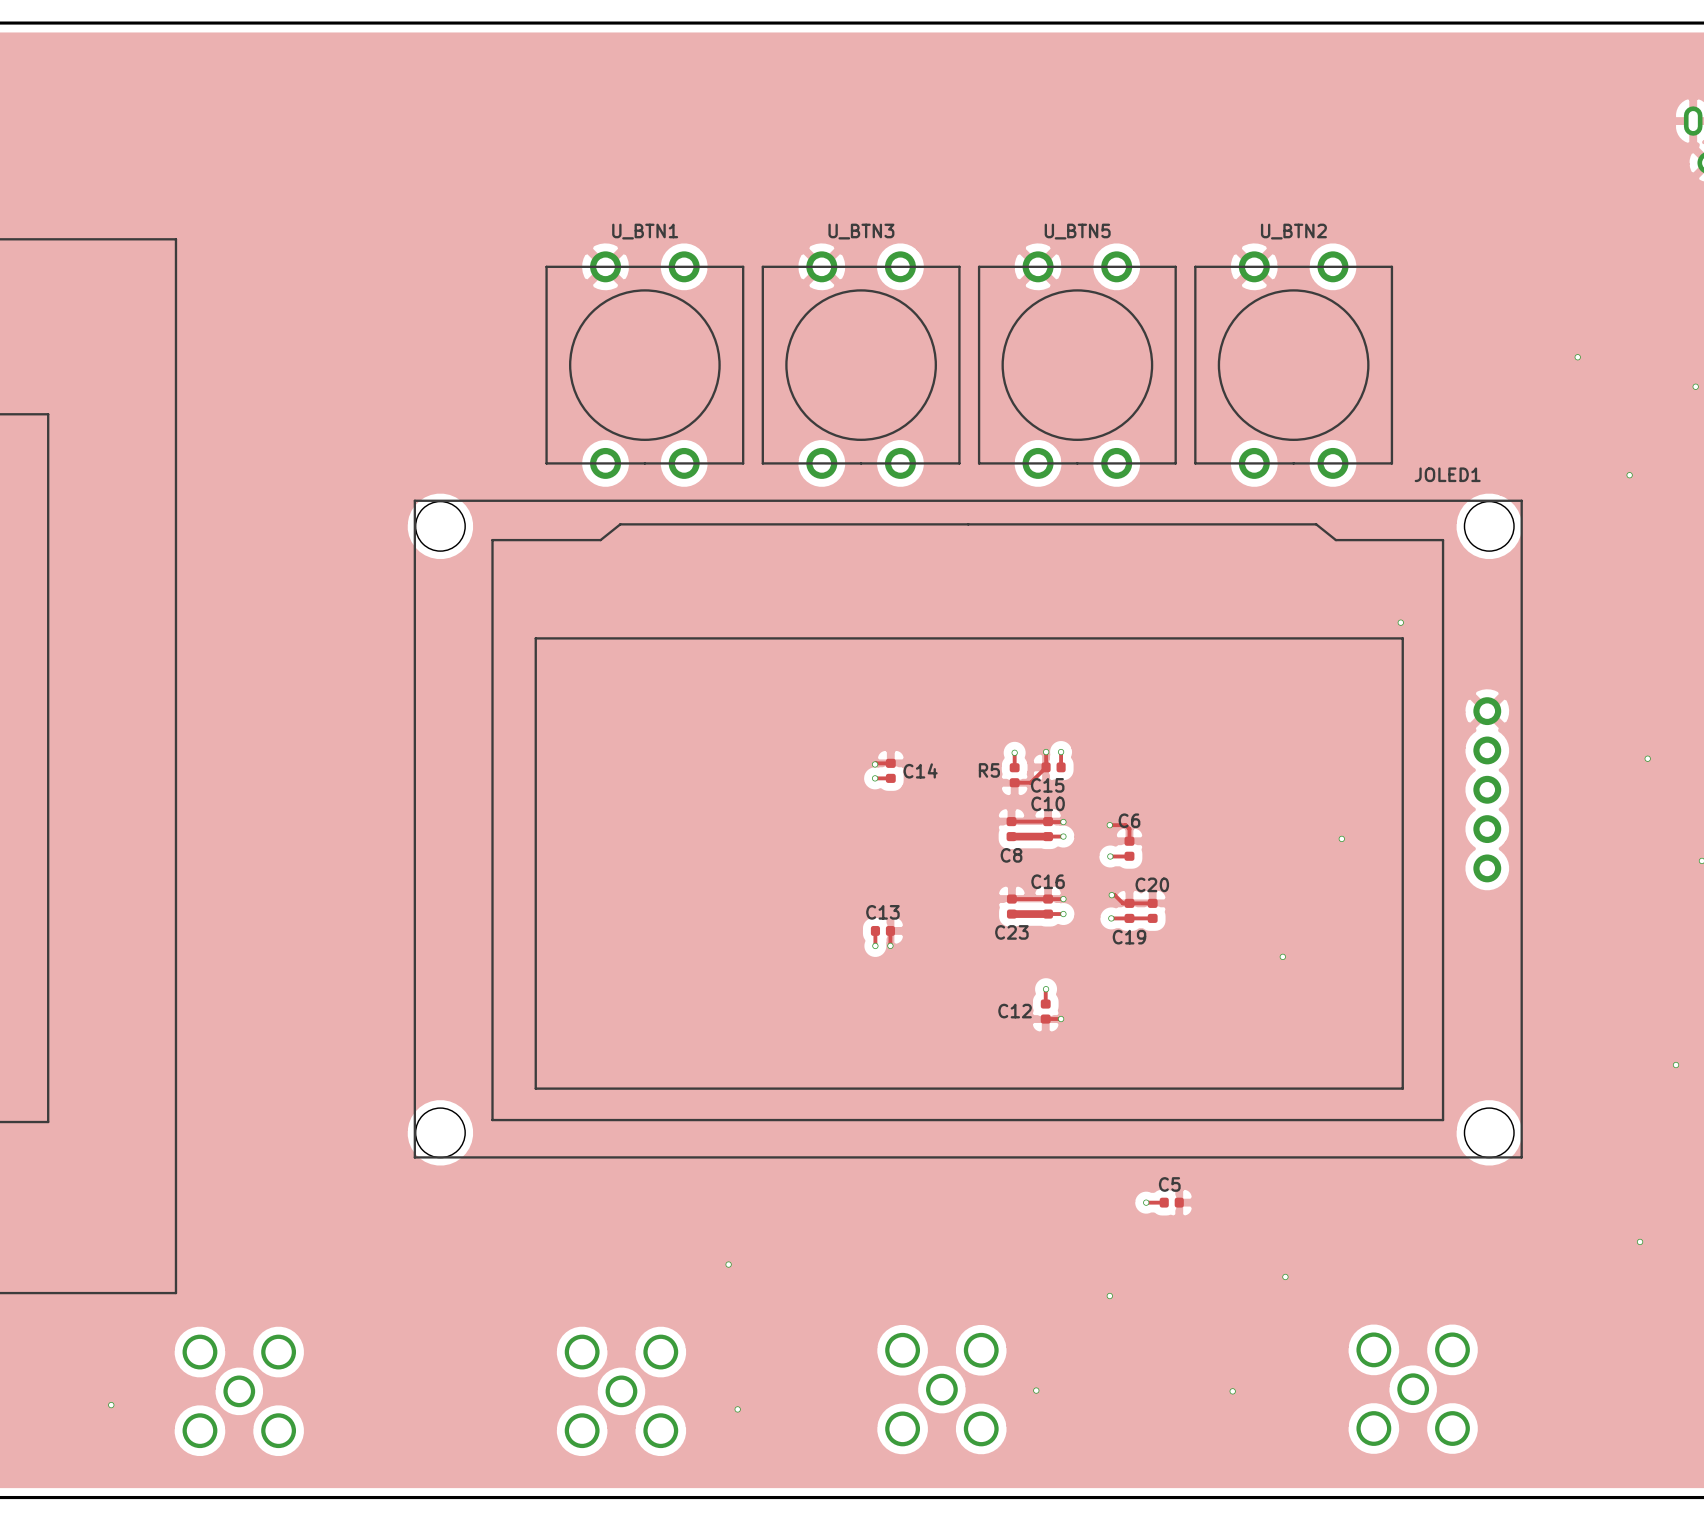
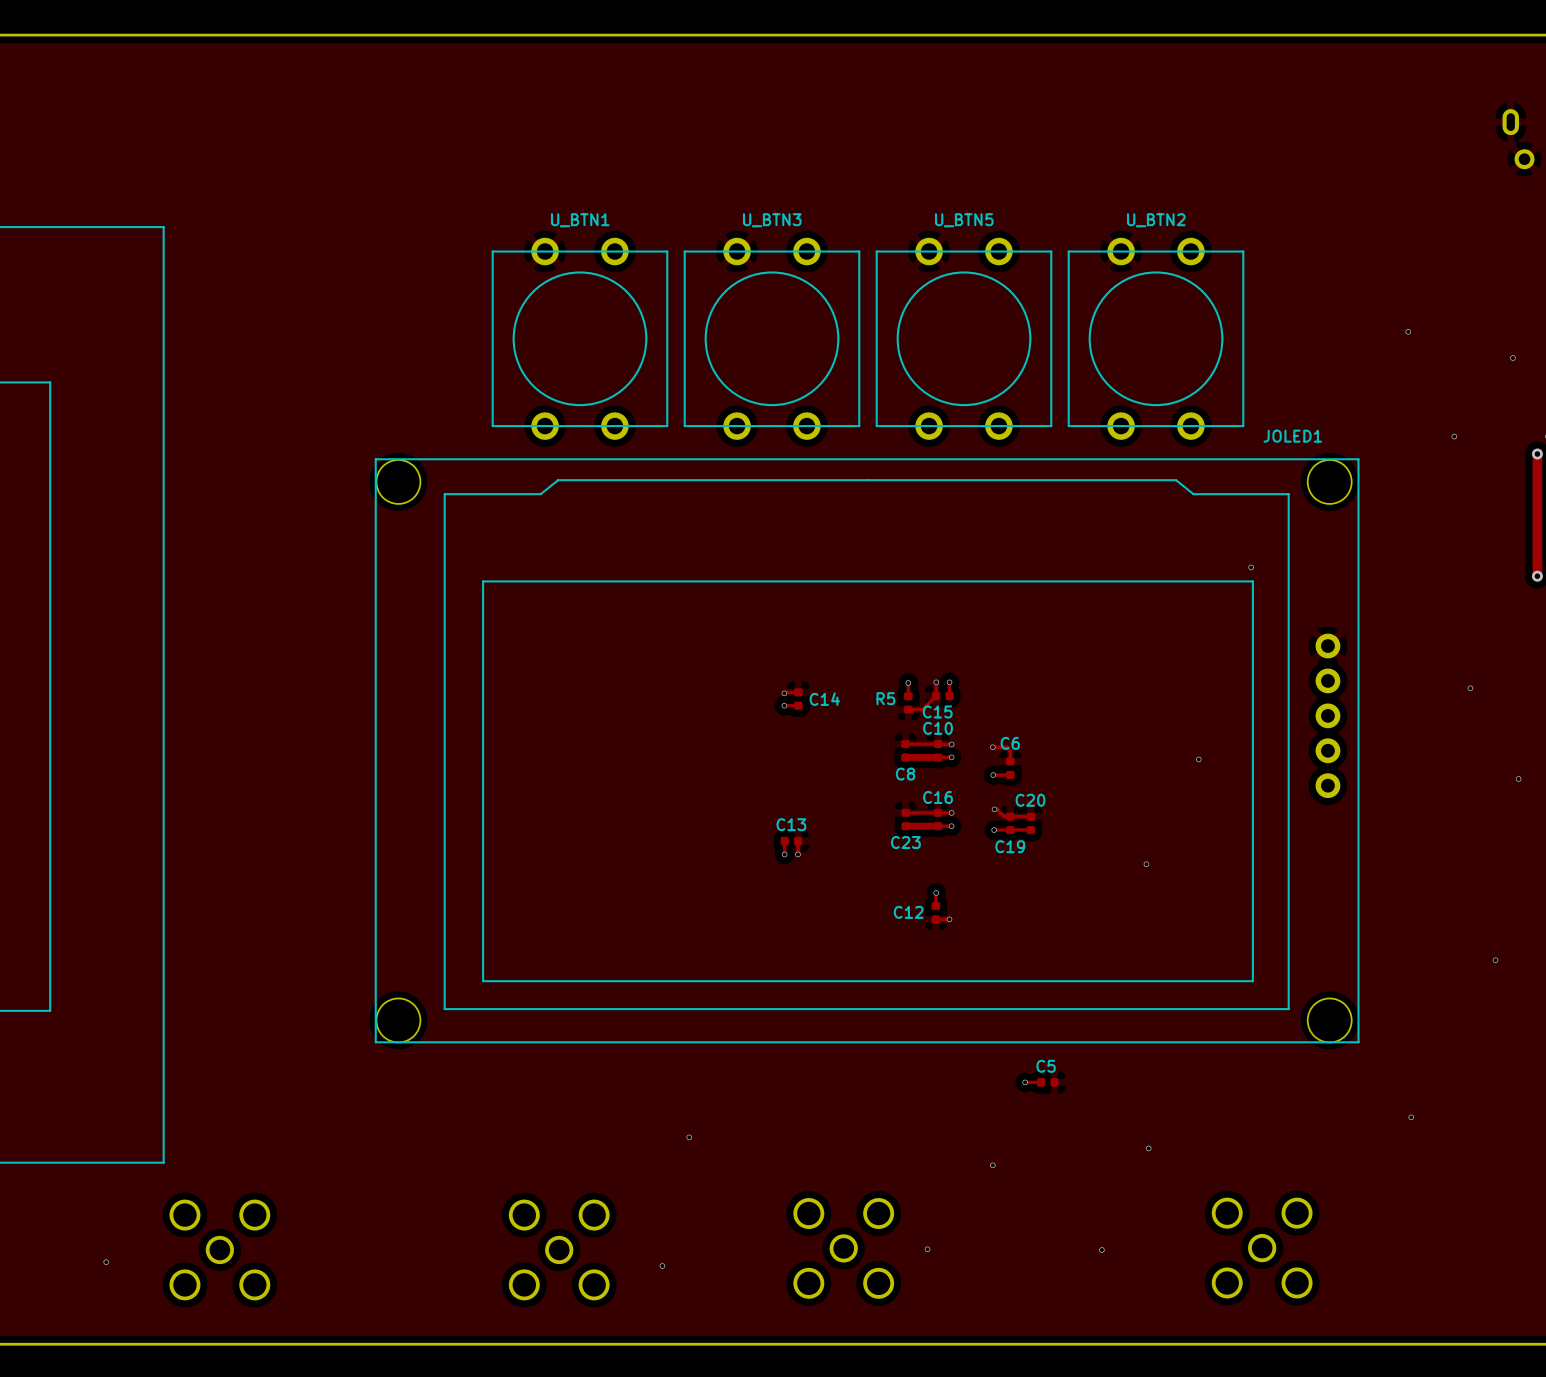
via position: (1640, 1241) -> (1411, 1117)
via position: (728, 1264) -> (689, 1137)

